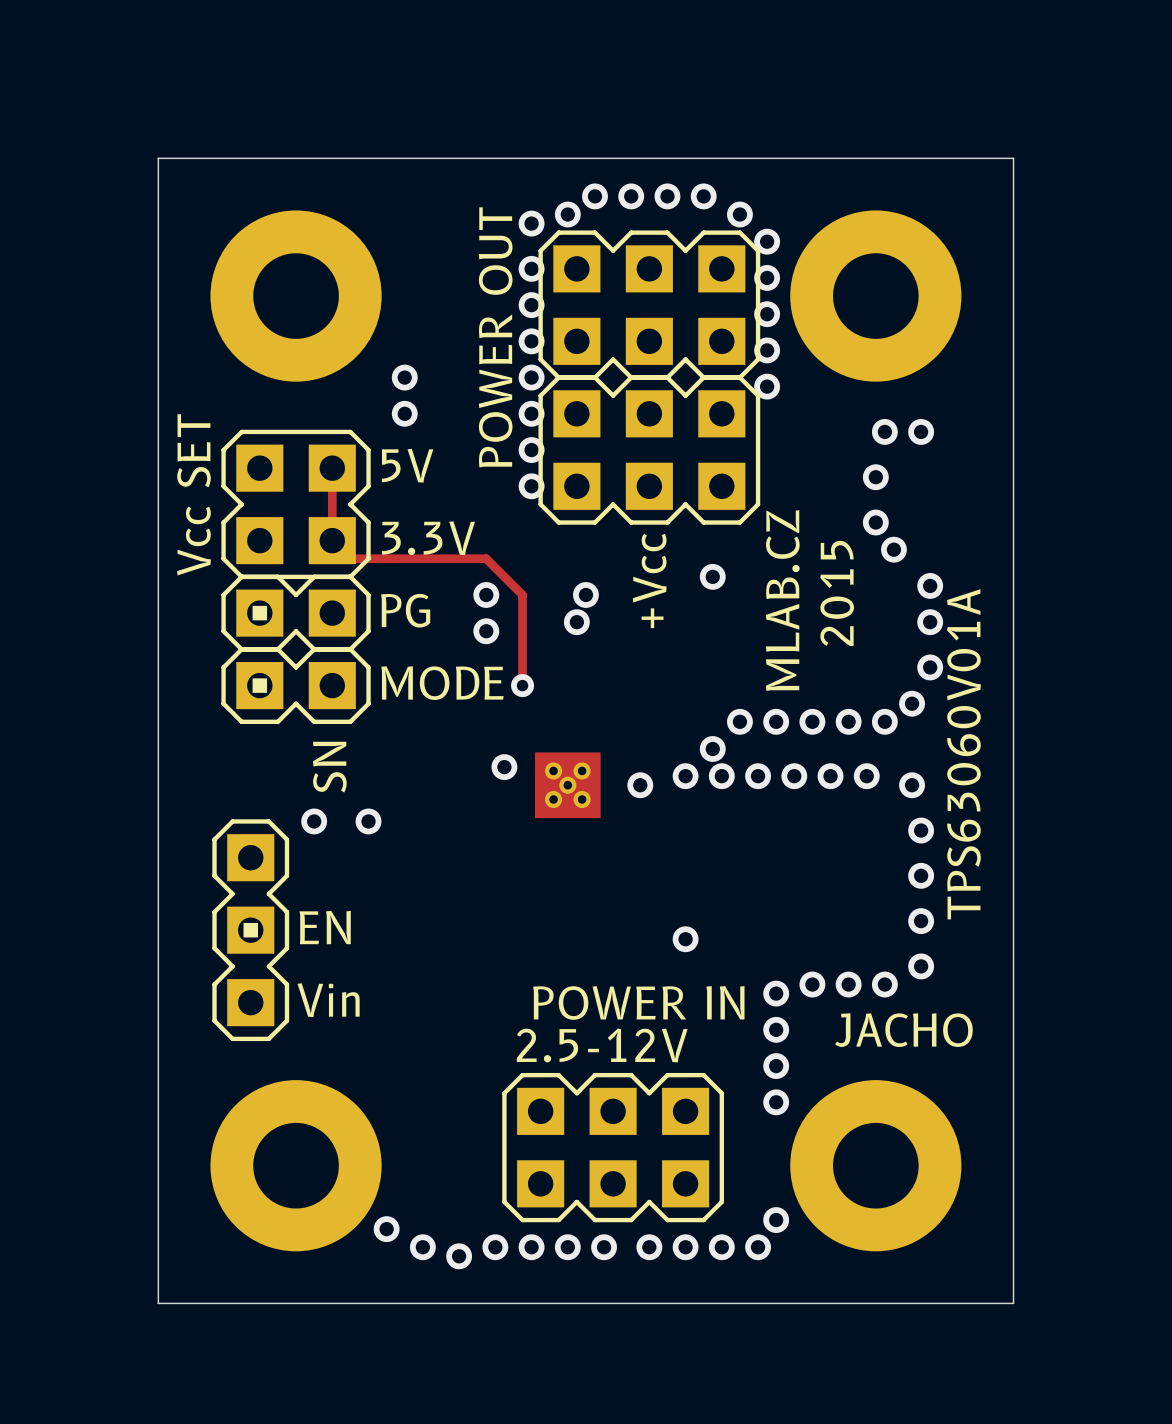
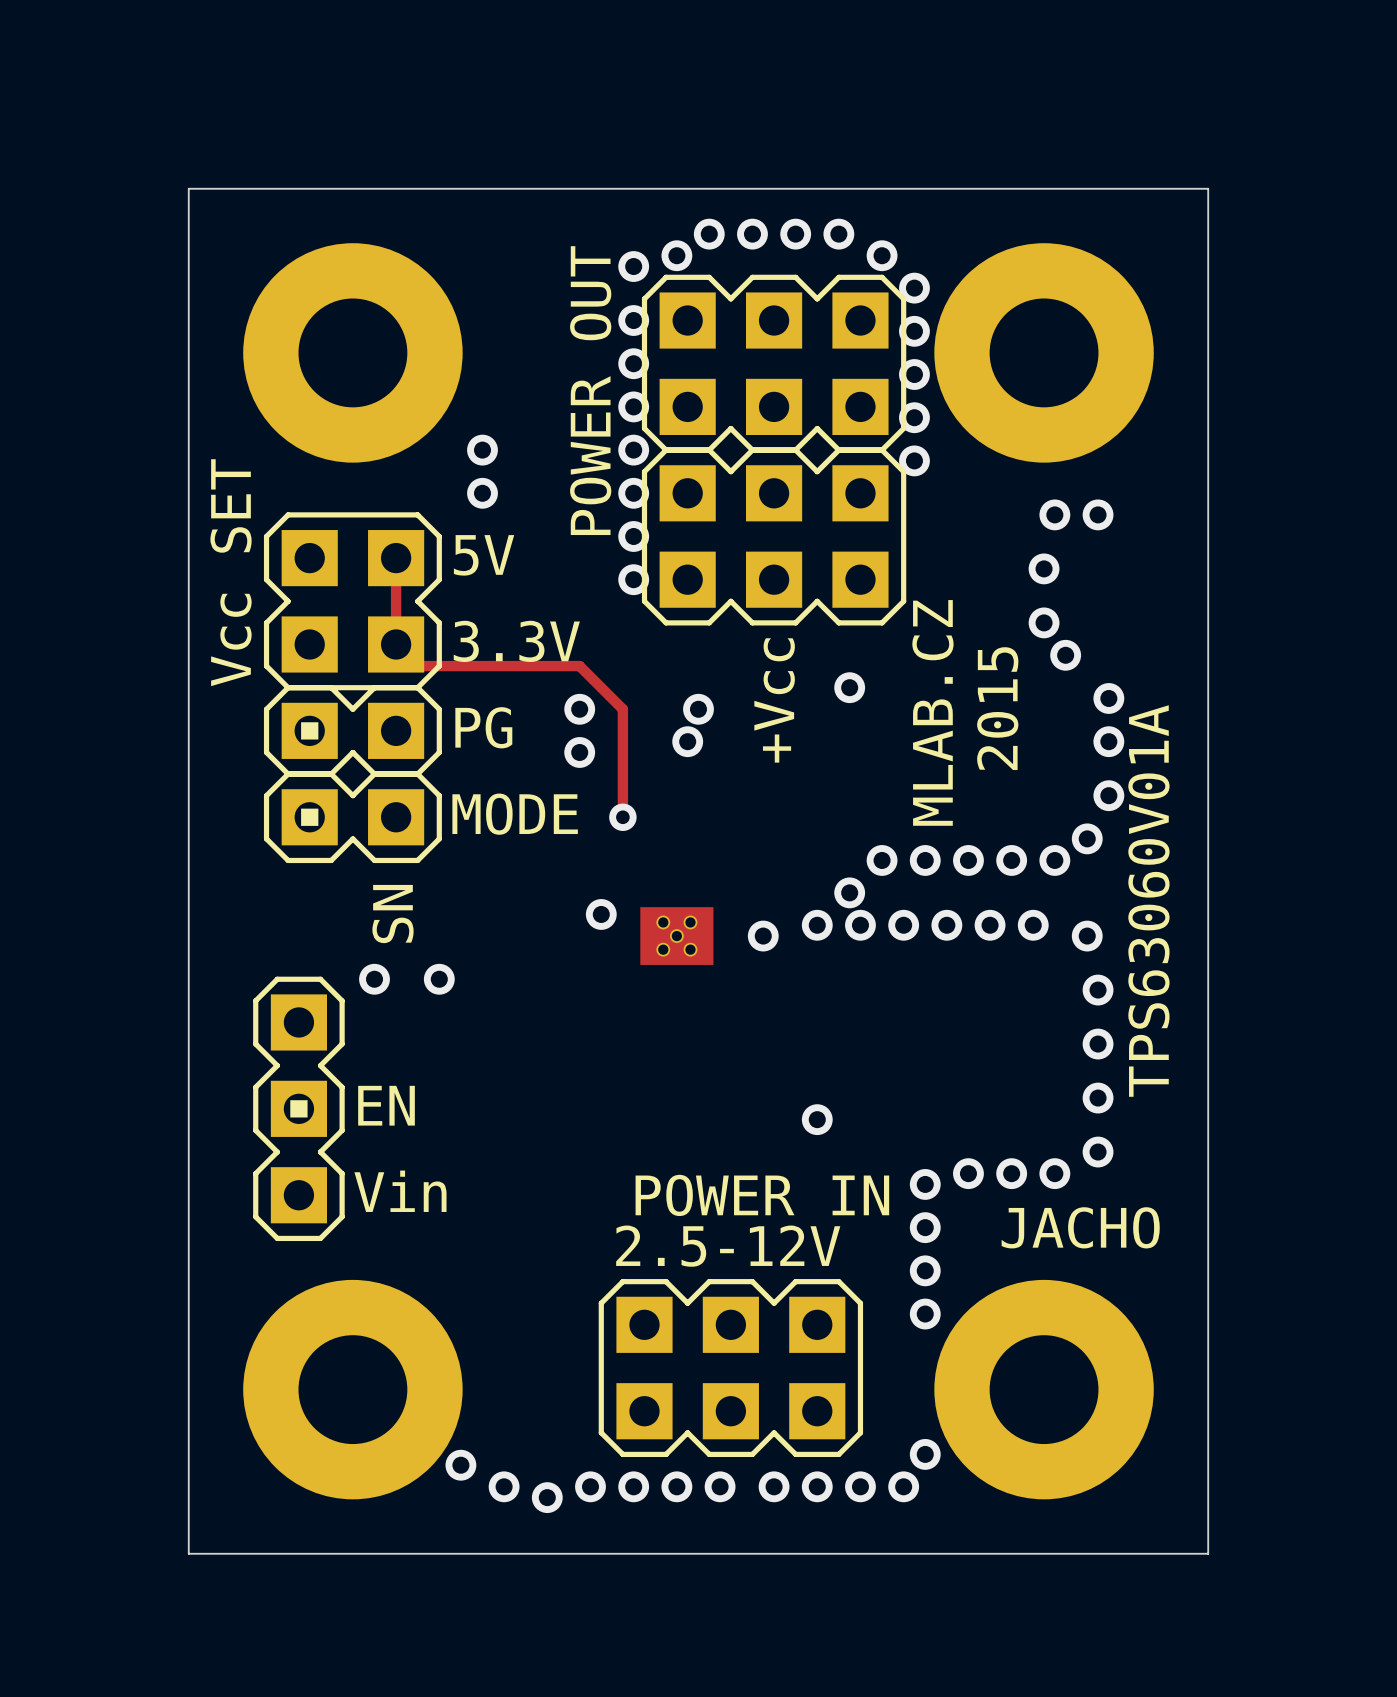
part footprint: [210, 210, 382, 382] -> [243, 243, 463, 463]
part footprint: [790, 210, 962, 382] -> [934, 243, 1154, 463]
part footprint: [535, 752, 601, 819] -> [640, 907, 714, 965]
part footprint: [210, 1080, 382, 1252] -> [243, 1279, 463, 1500]
part footprint: [790, 1080, 962, 1252] -> [934, 1279, 1154, 1500]

